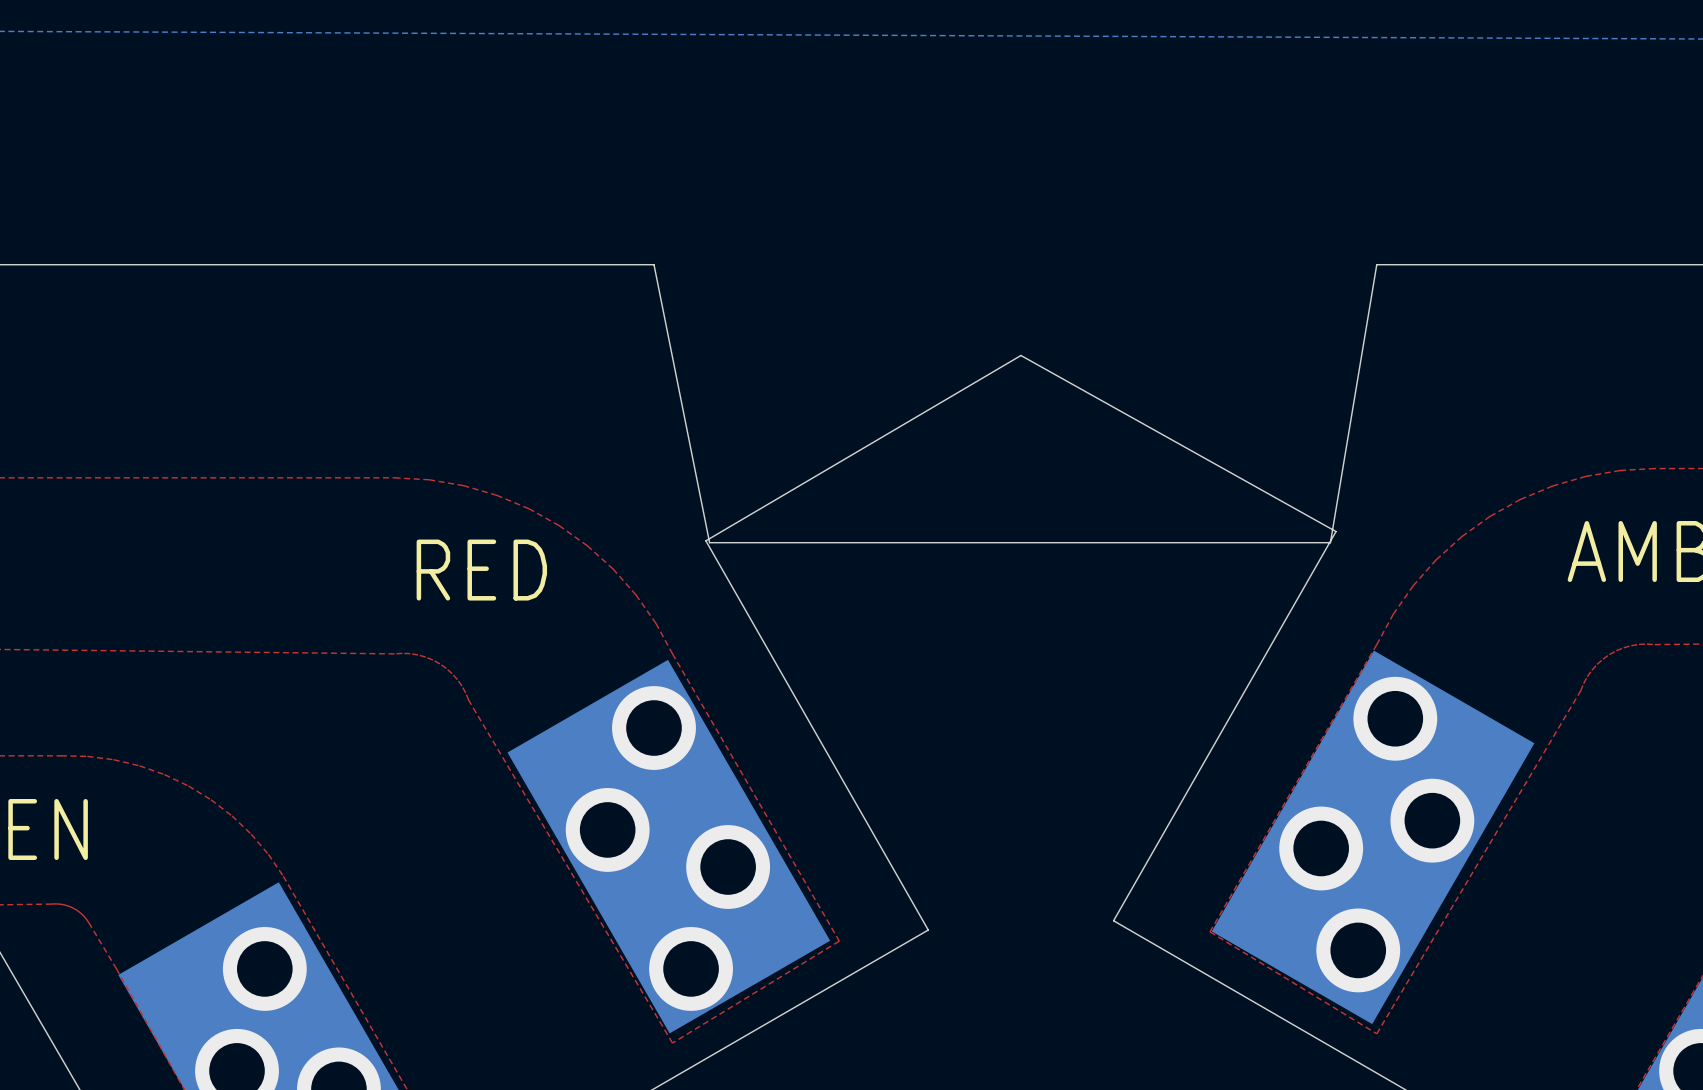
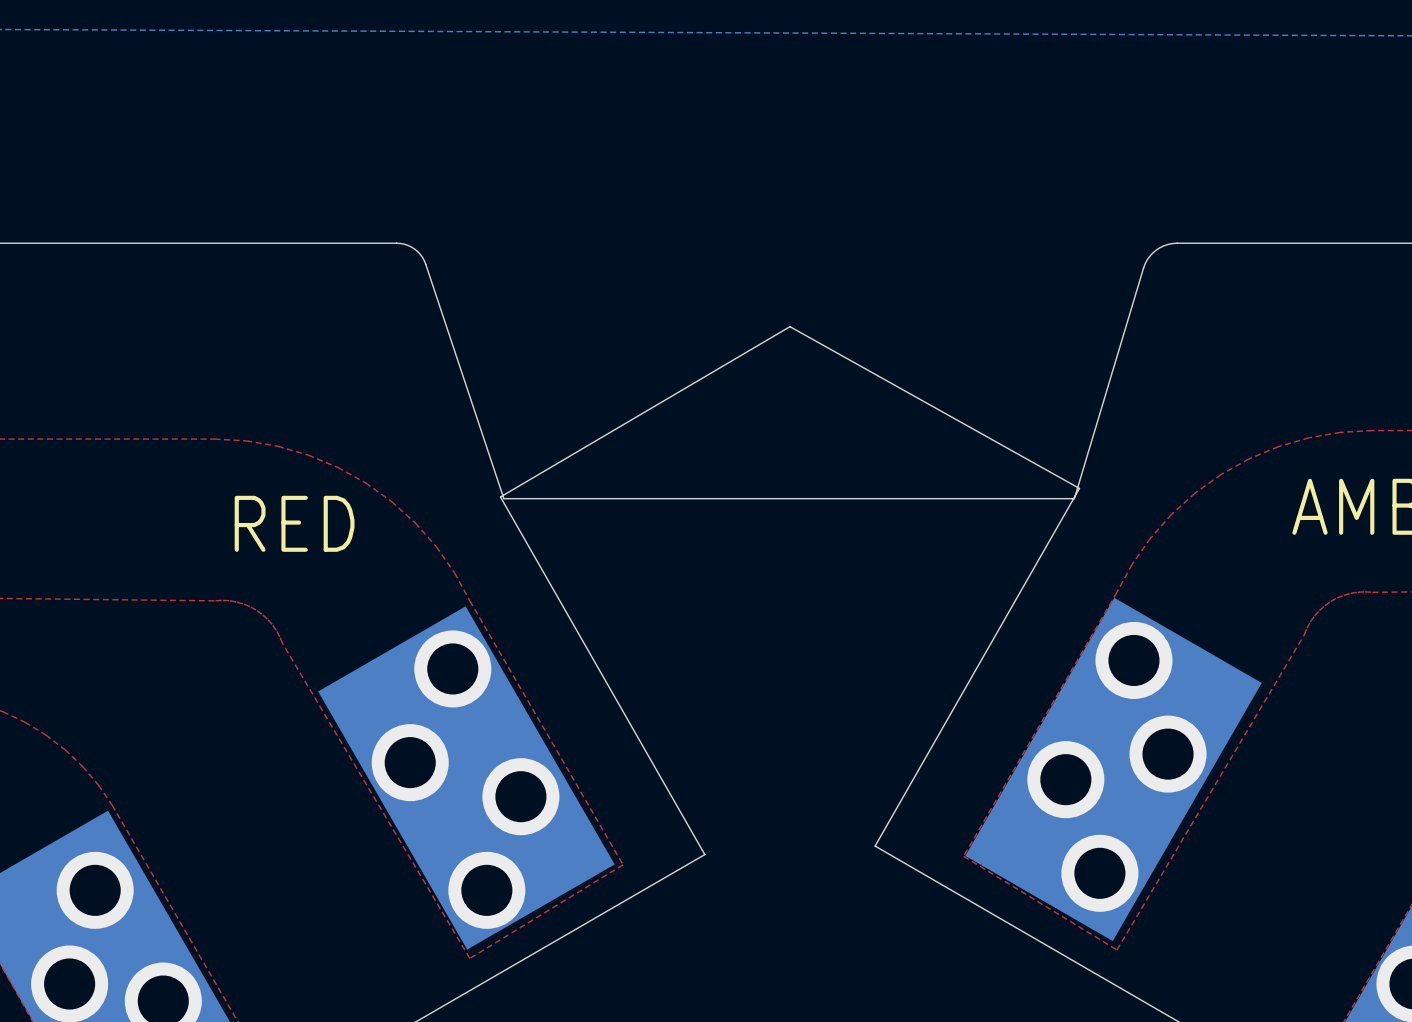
board edge: (592, 264) (654, 264) (709, 542) -> (396, 243) (411, 246) (424, 260) (503, 498)
board edge: (1442, 264) (1376, 264) (1330, 542) -> (1177, 243) (1159, 247) (1149, 256) (1145, 264) (1074, 498)

